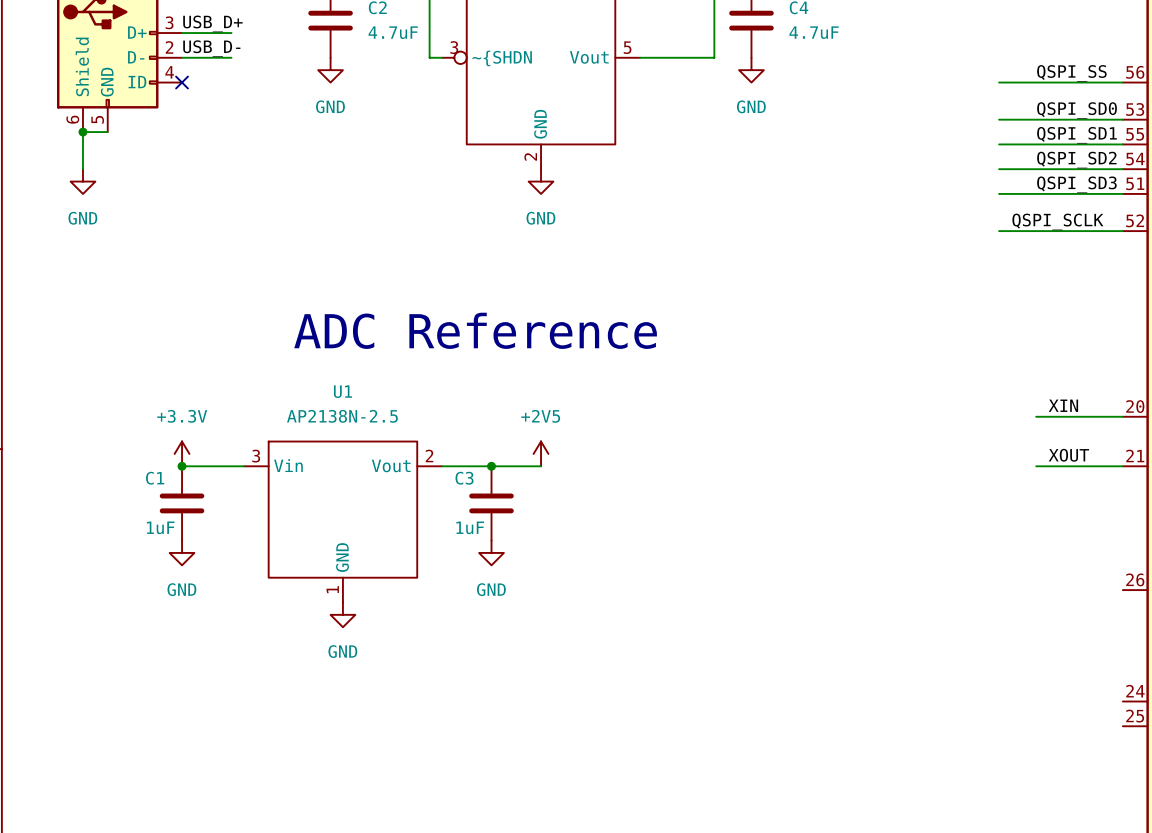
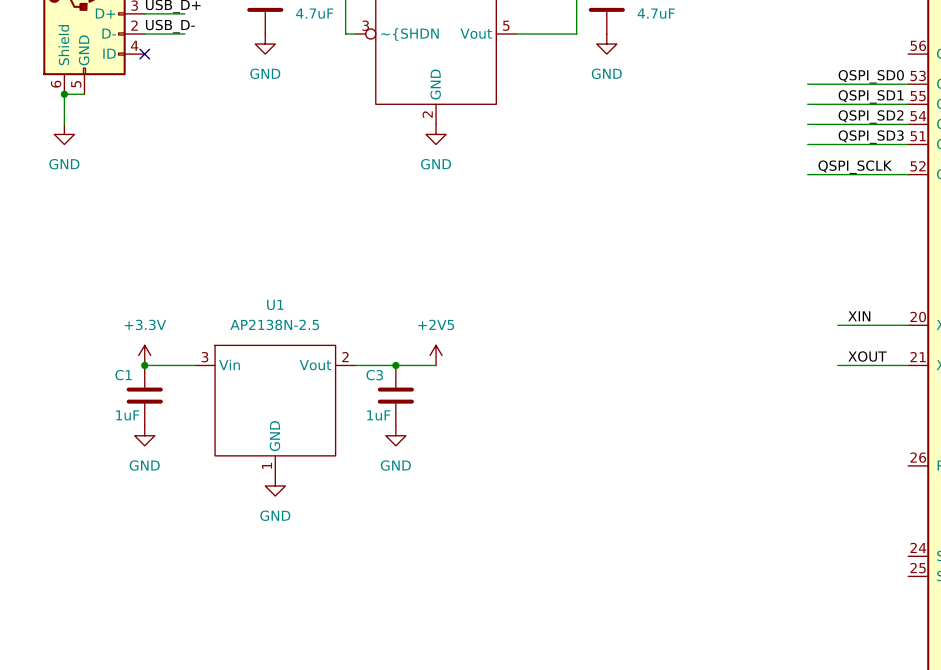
label: QSPI_SS (1071, 73) -> none
wire: (999, 82) (1122, 82) -> none
text: ADC Reference (475, 330) -> none

